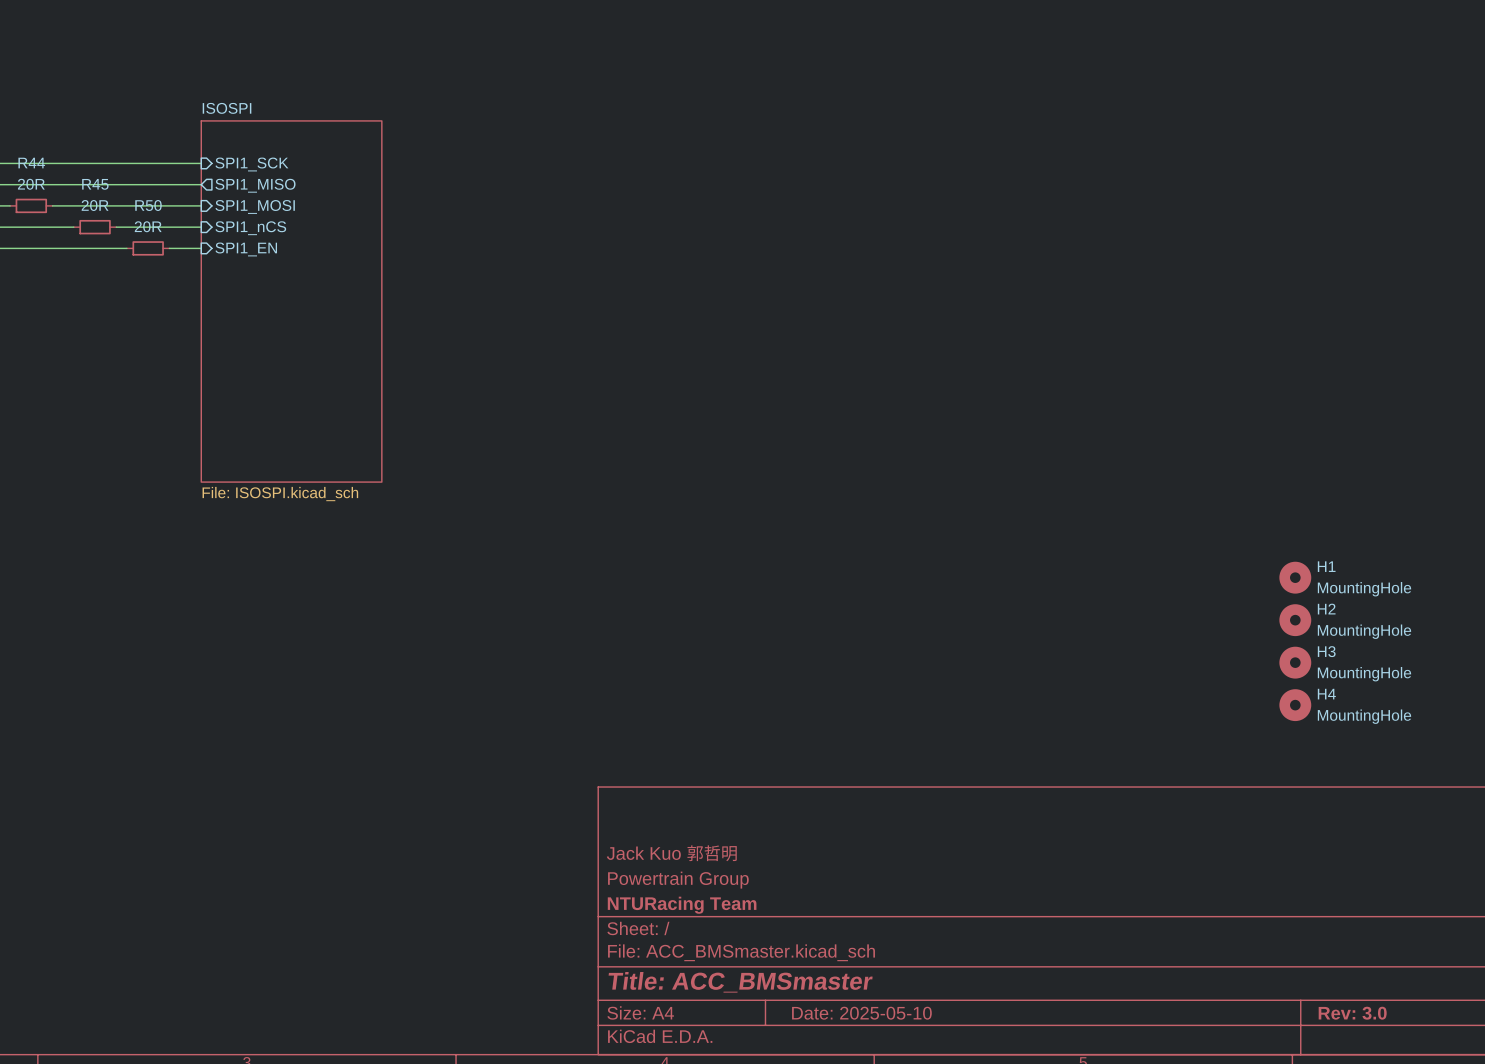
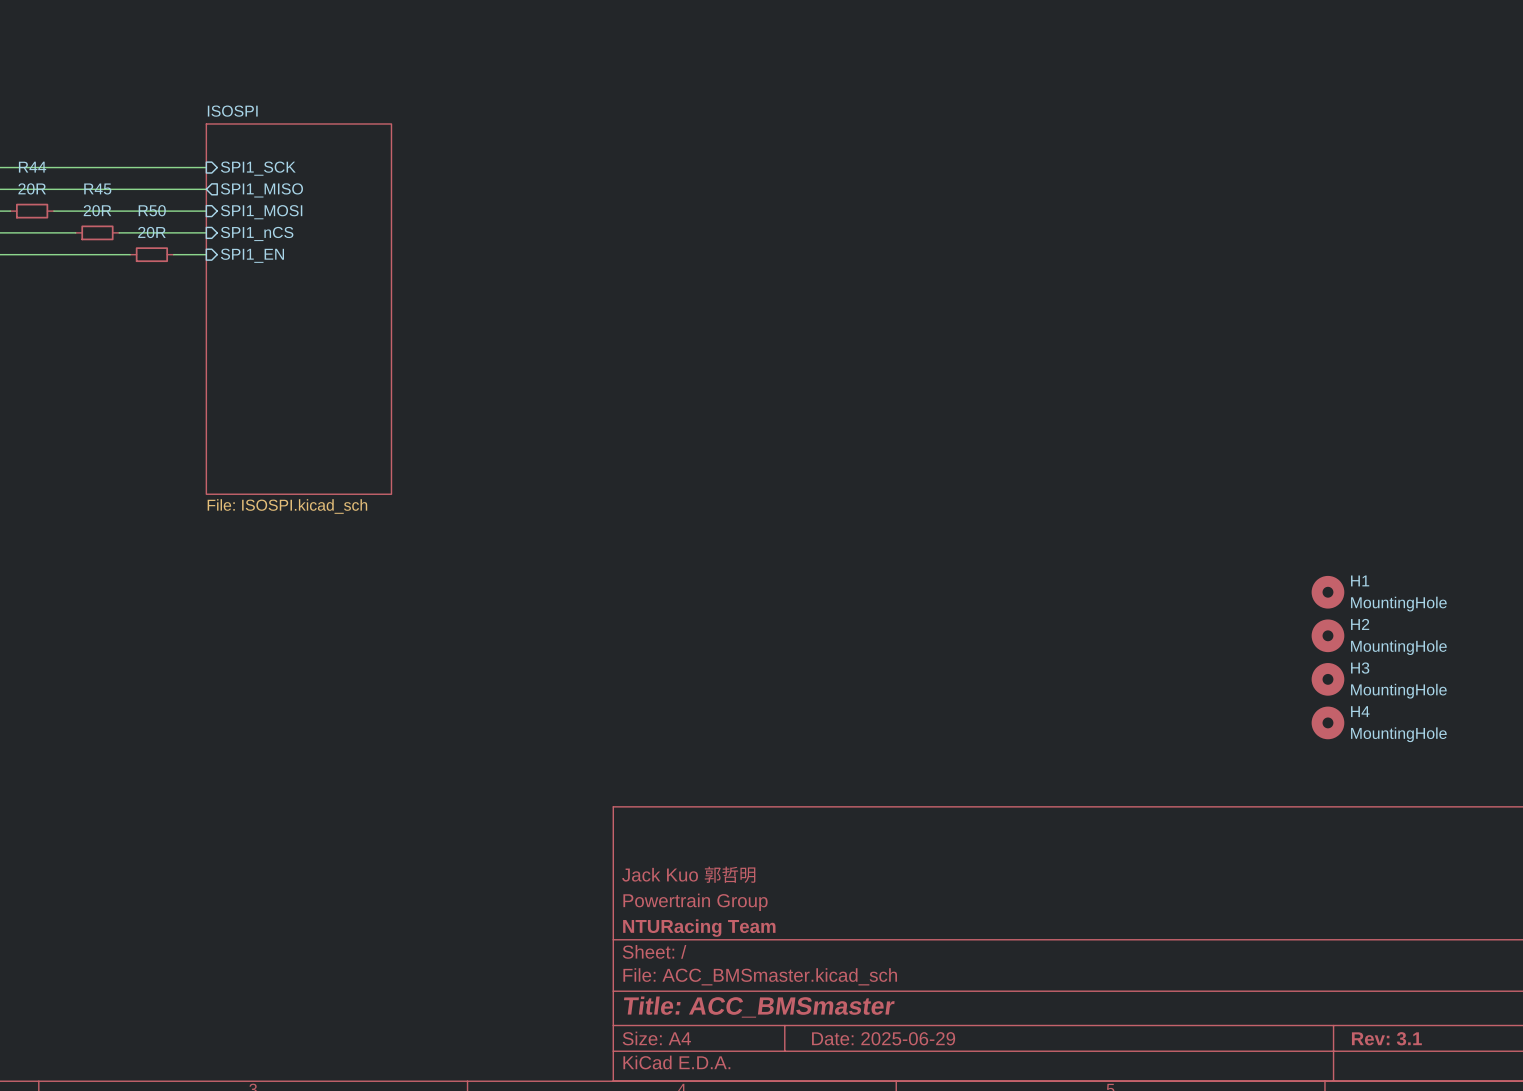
title block: Date: 2025-05-10 (861, 1013) -> Date: 2025-06-29 (883, 1038)
title block: Rev: 3.0 (1352, 1013) -> Rev: 3.1 (1386, 1038)

